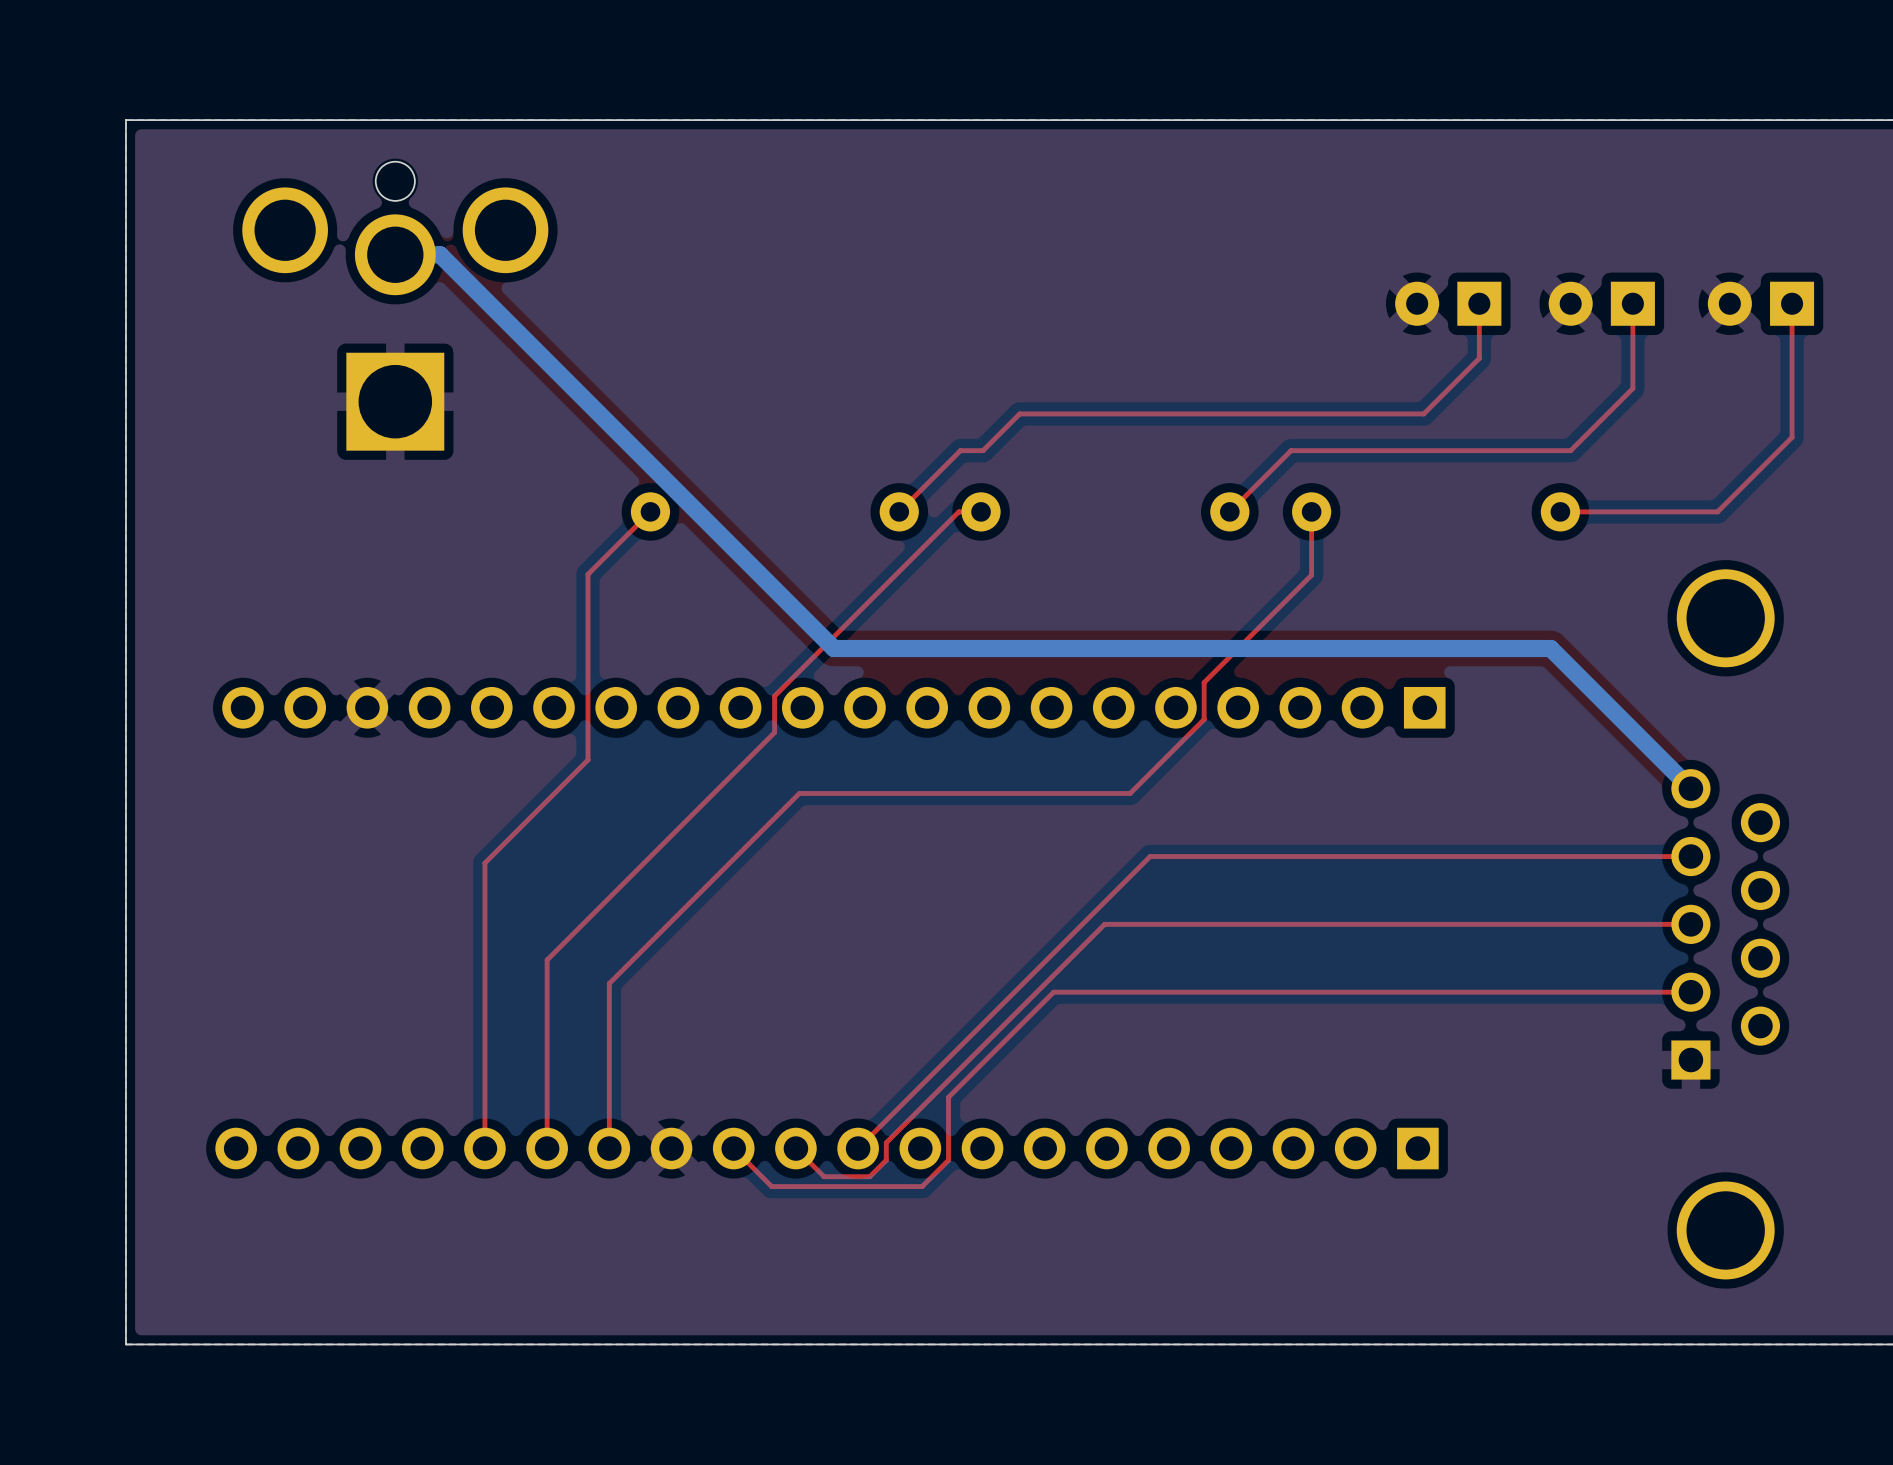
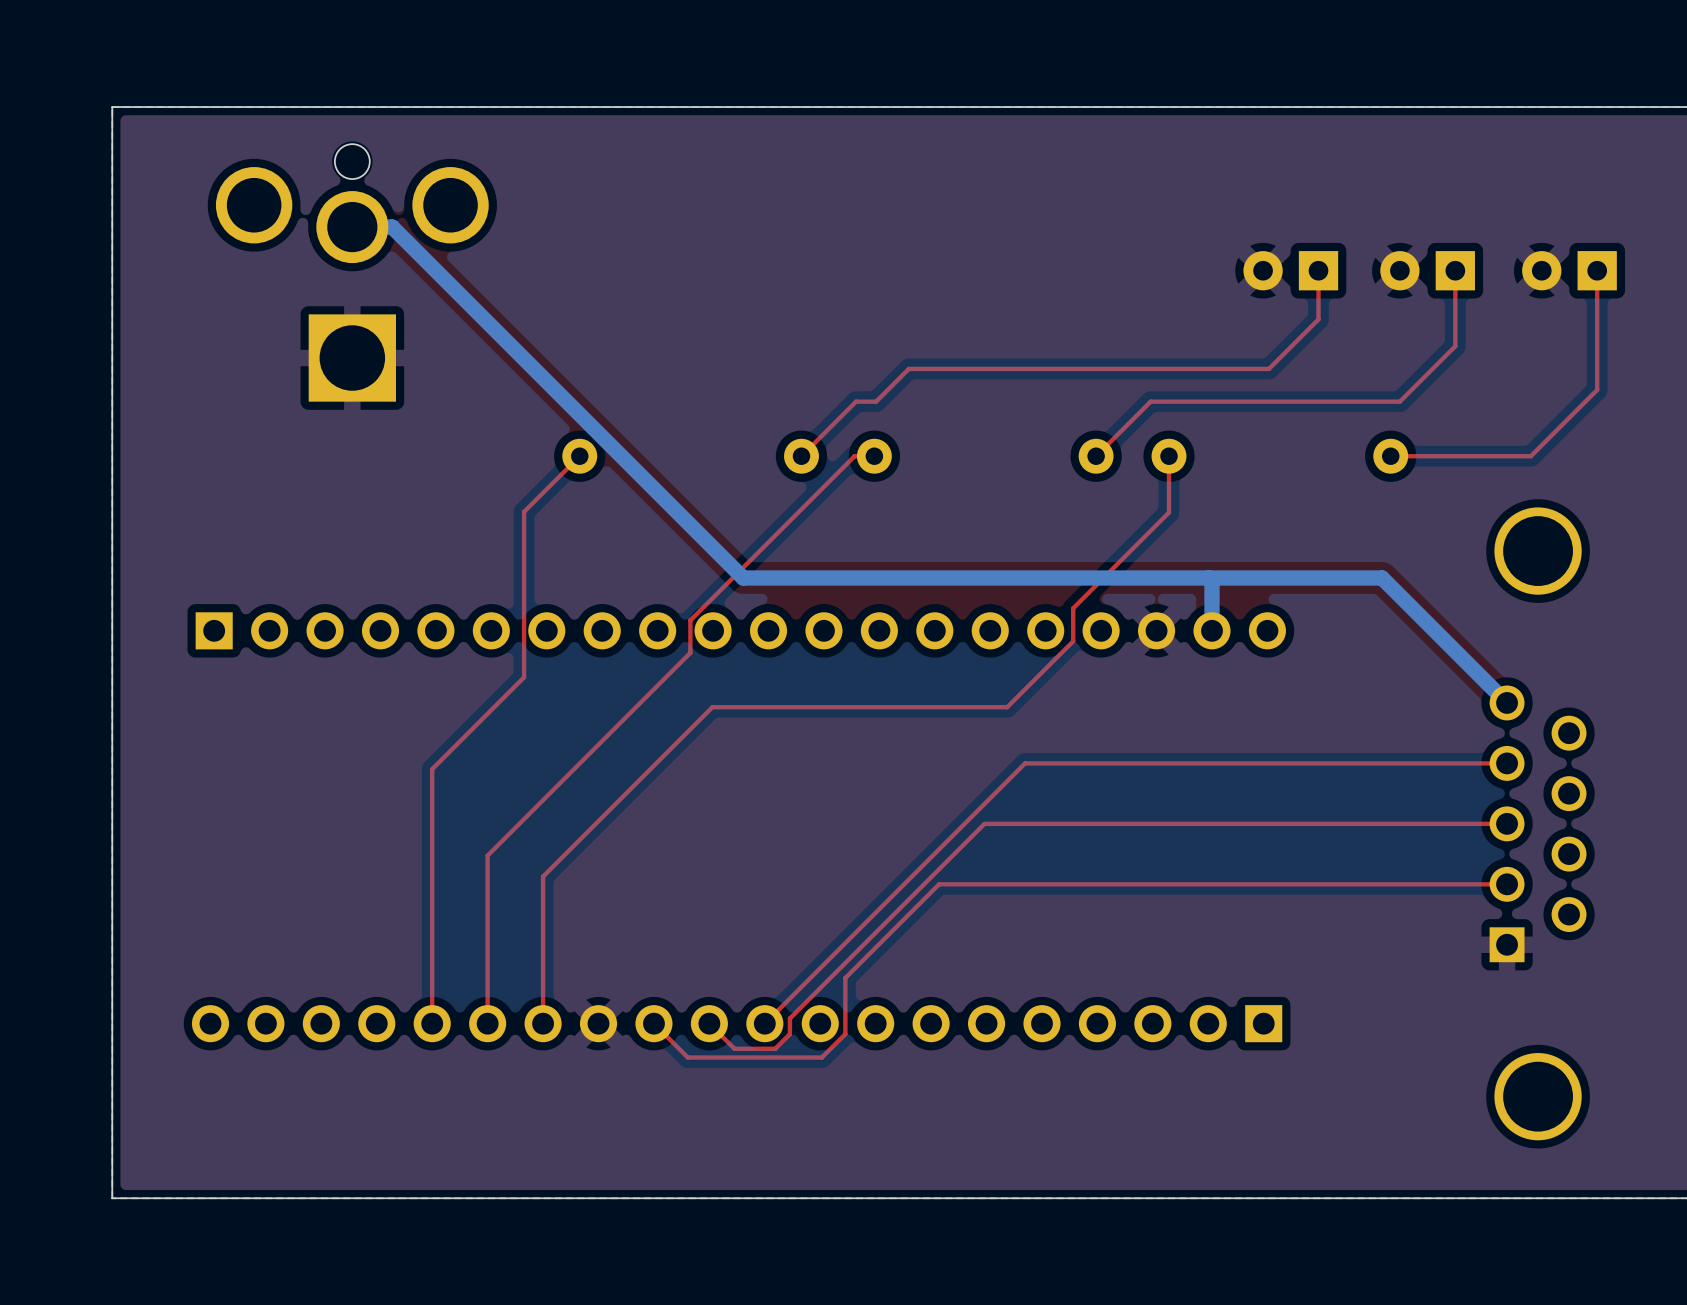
bottom track: none -> (1208, 577) (1212, 581) (1212, 630)
part rotation: 0° (833, 707) -> 180° (740, 630)

